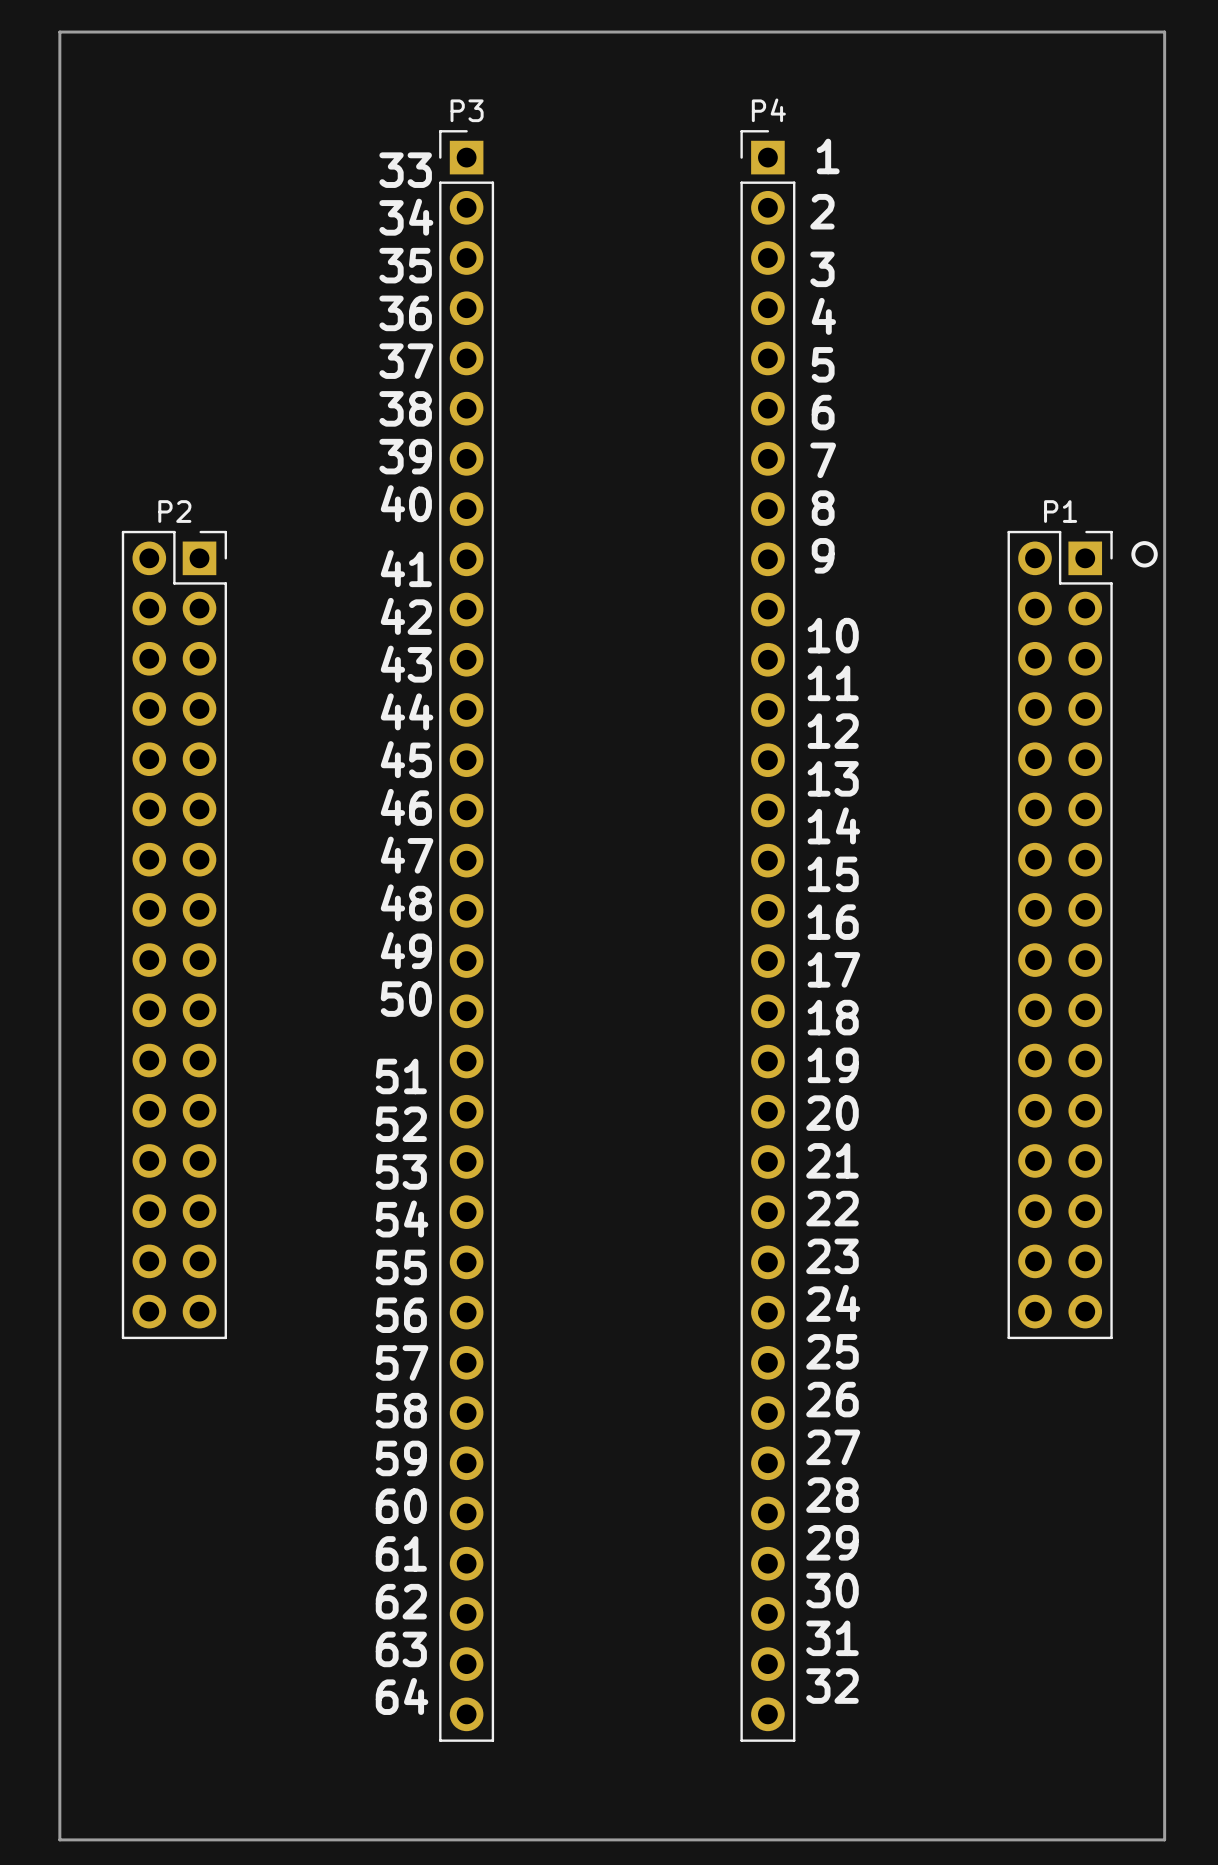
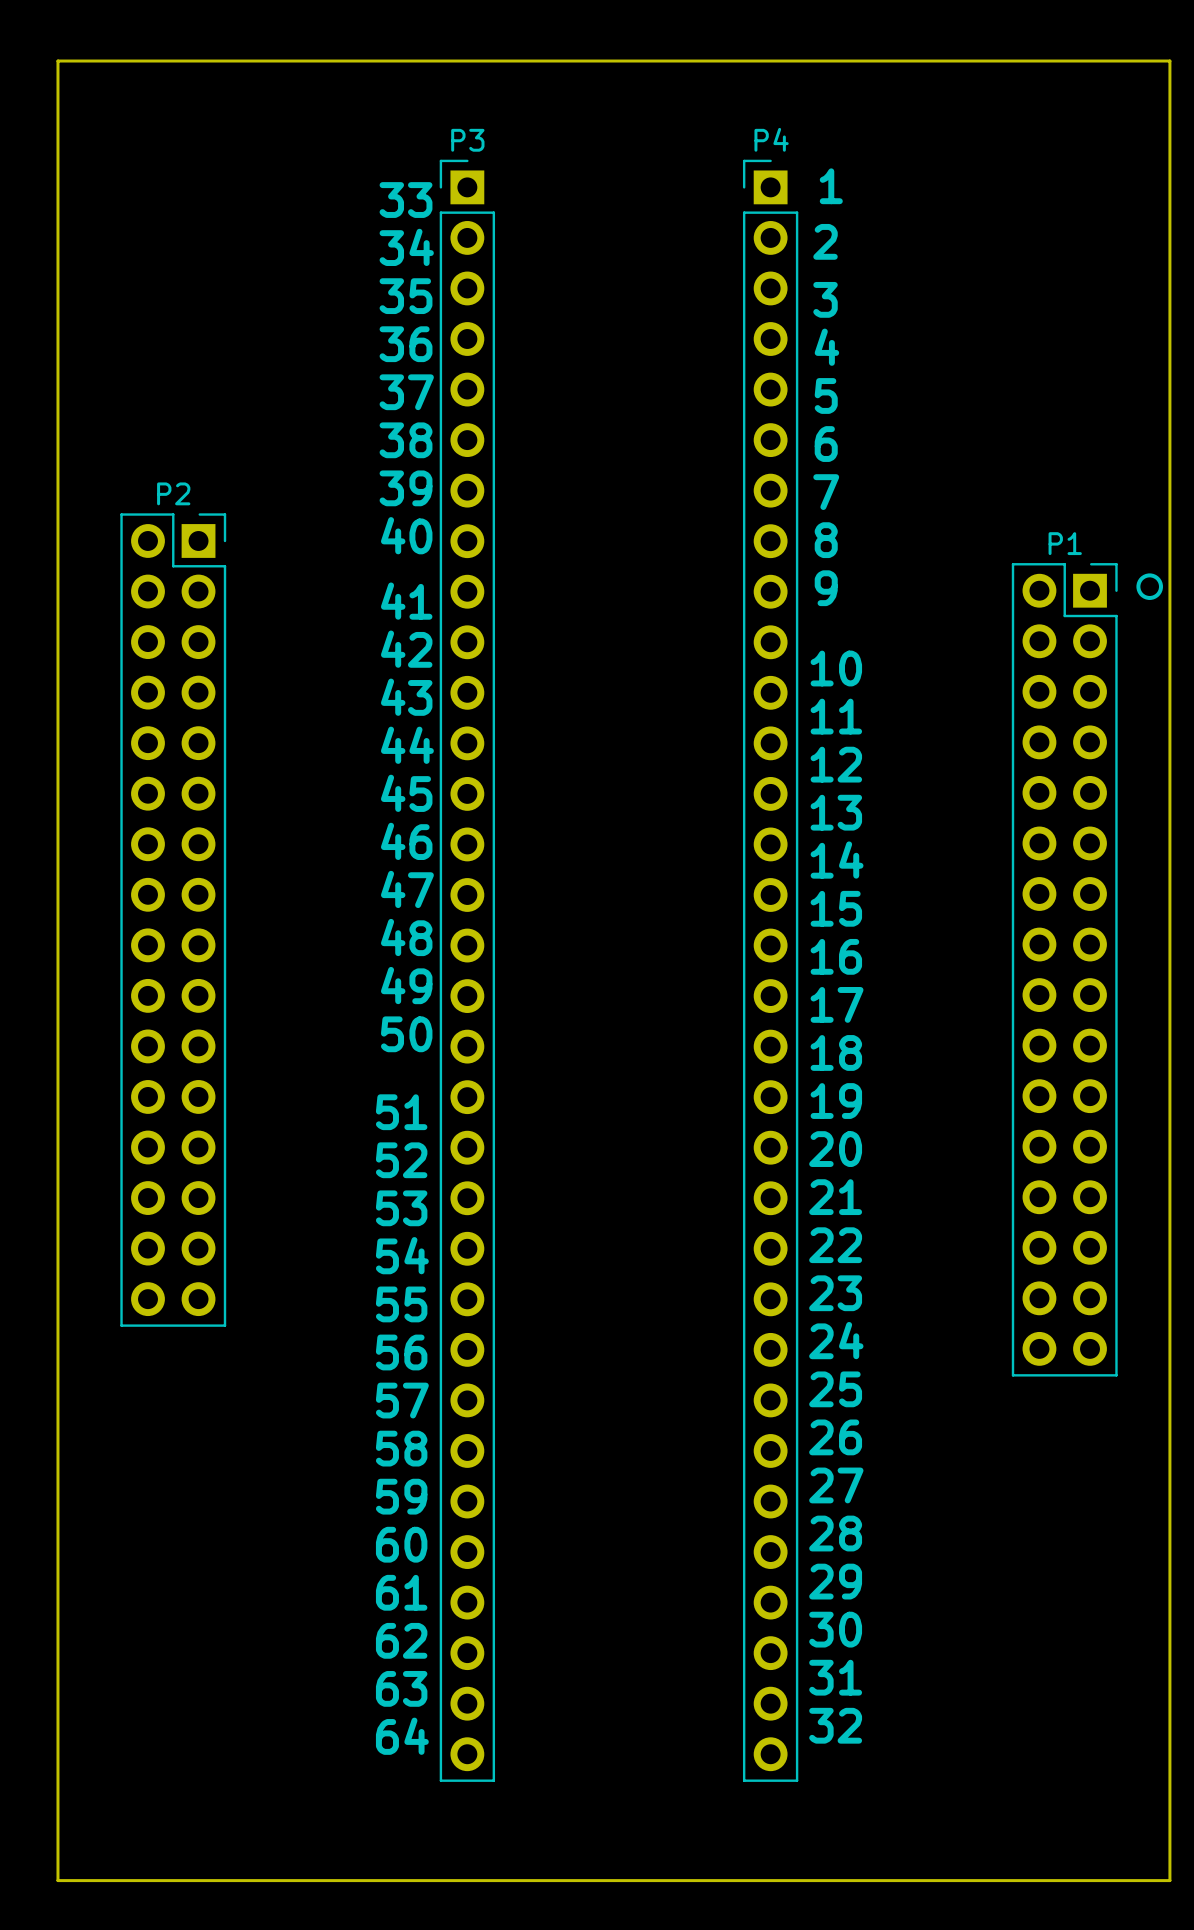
P2 position: (174, 934) -> (173, 920)

